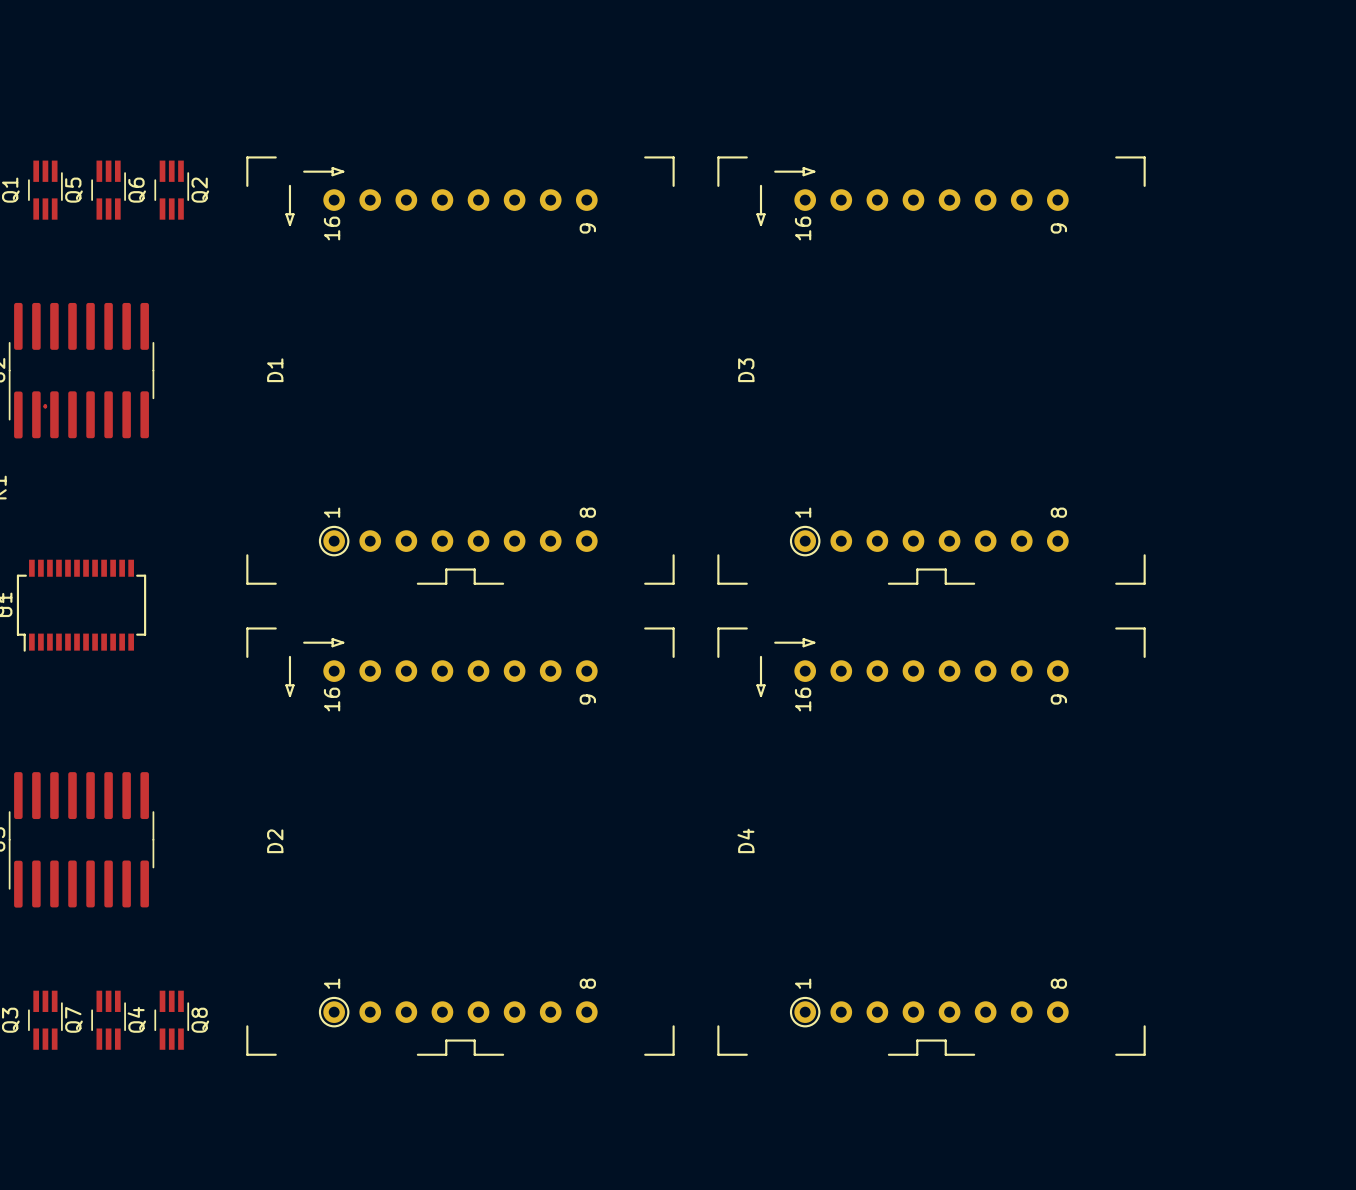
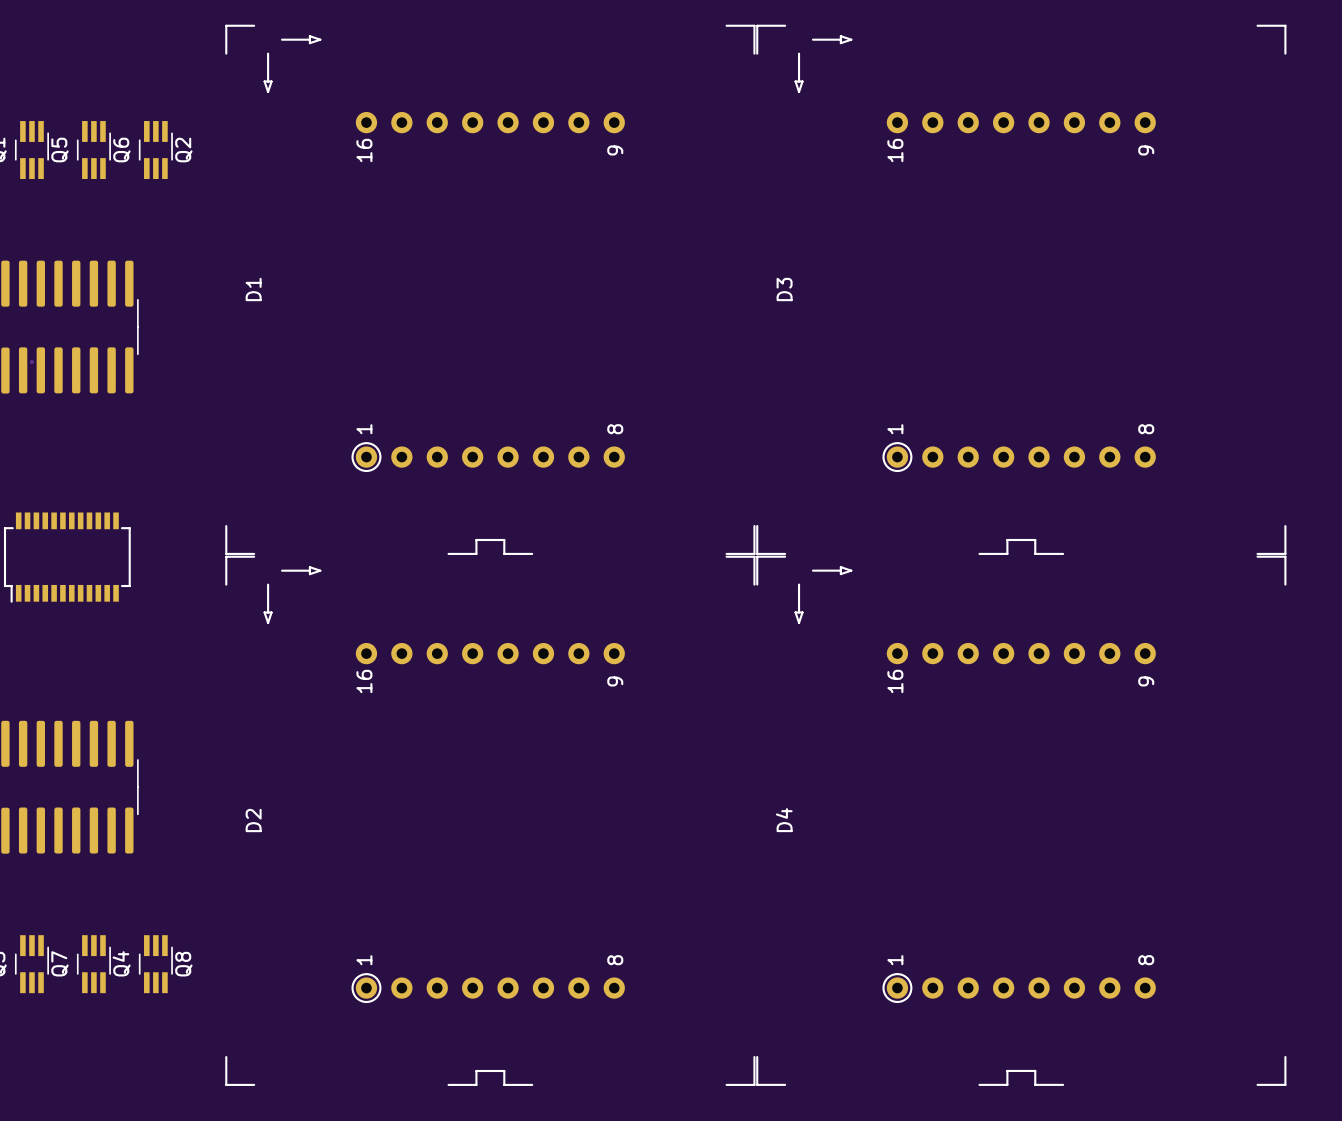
D1 footprint: [246, 156, 675, 585] -> [225, 24, 756, 555]
D3 footprint: [717, 156, 1146, 585] -> [756, 24, 1287, 555]
D1 name position: D1 (275, 370) -> D1 (253, 289)
D3 name position: D3 (746, 370) -> D3 (784, 289)
D2 footprint: [246, 627, 675, 1056] -> [225, 555, 756, 1086]
D4 footprint: [717, 627, 1146, 1056] -> [756, 555, 1287, 1086]
D4 name position: D4 (745, 840) -> D4 (784, 820)
D2 name position: D2 (275, 841) -> D2 (253, 820)

